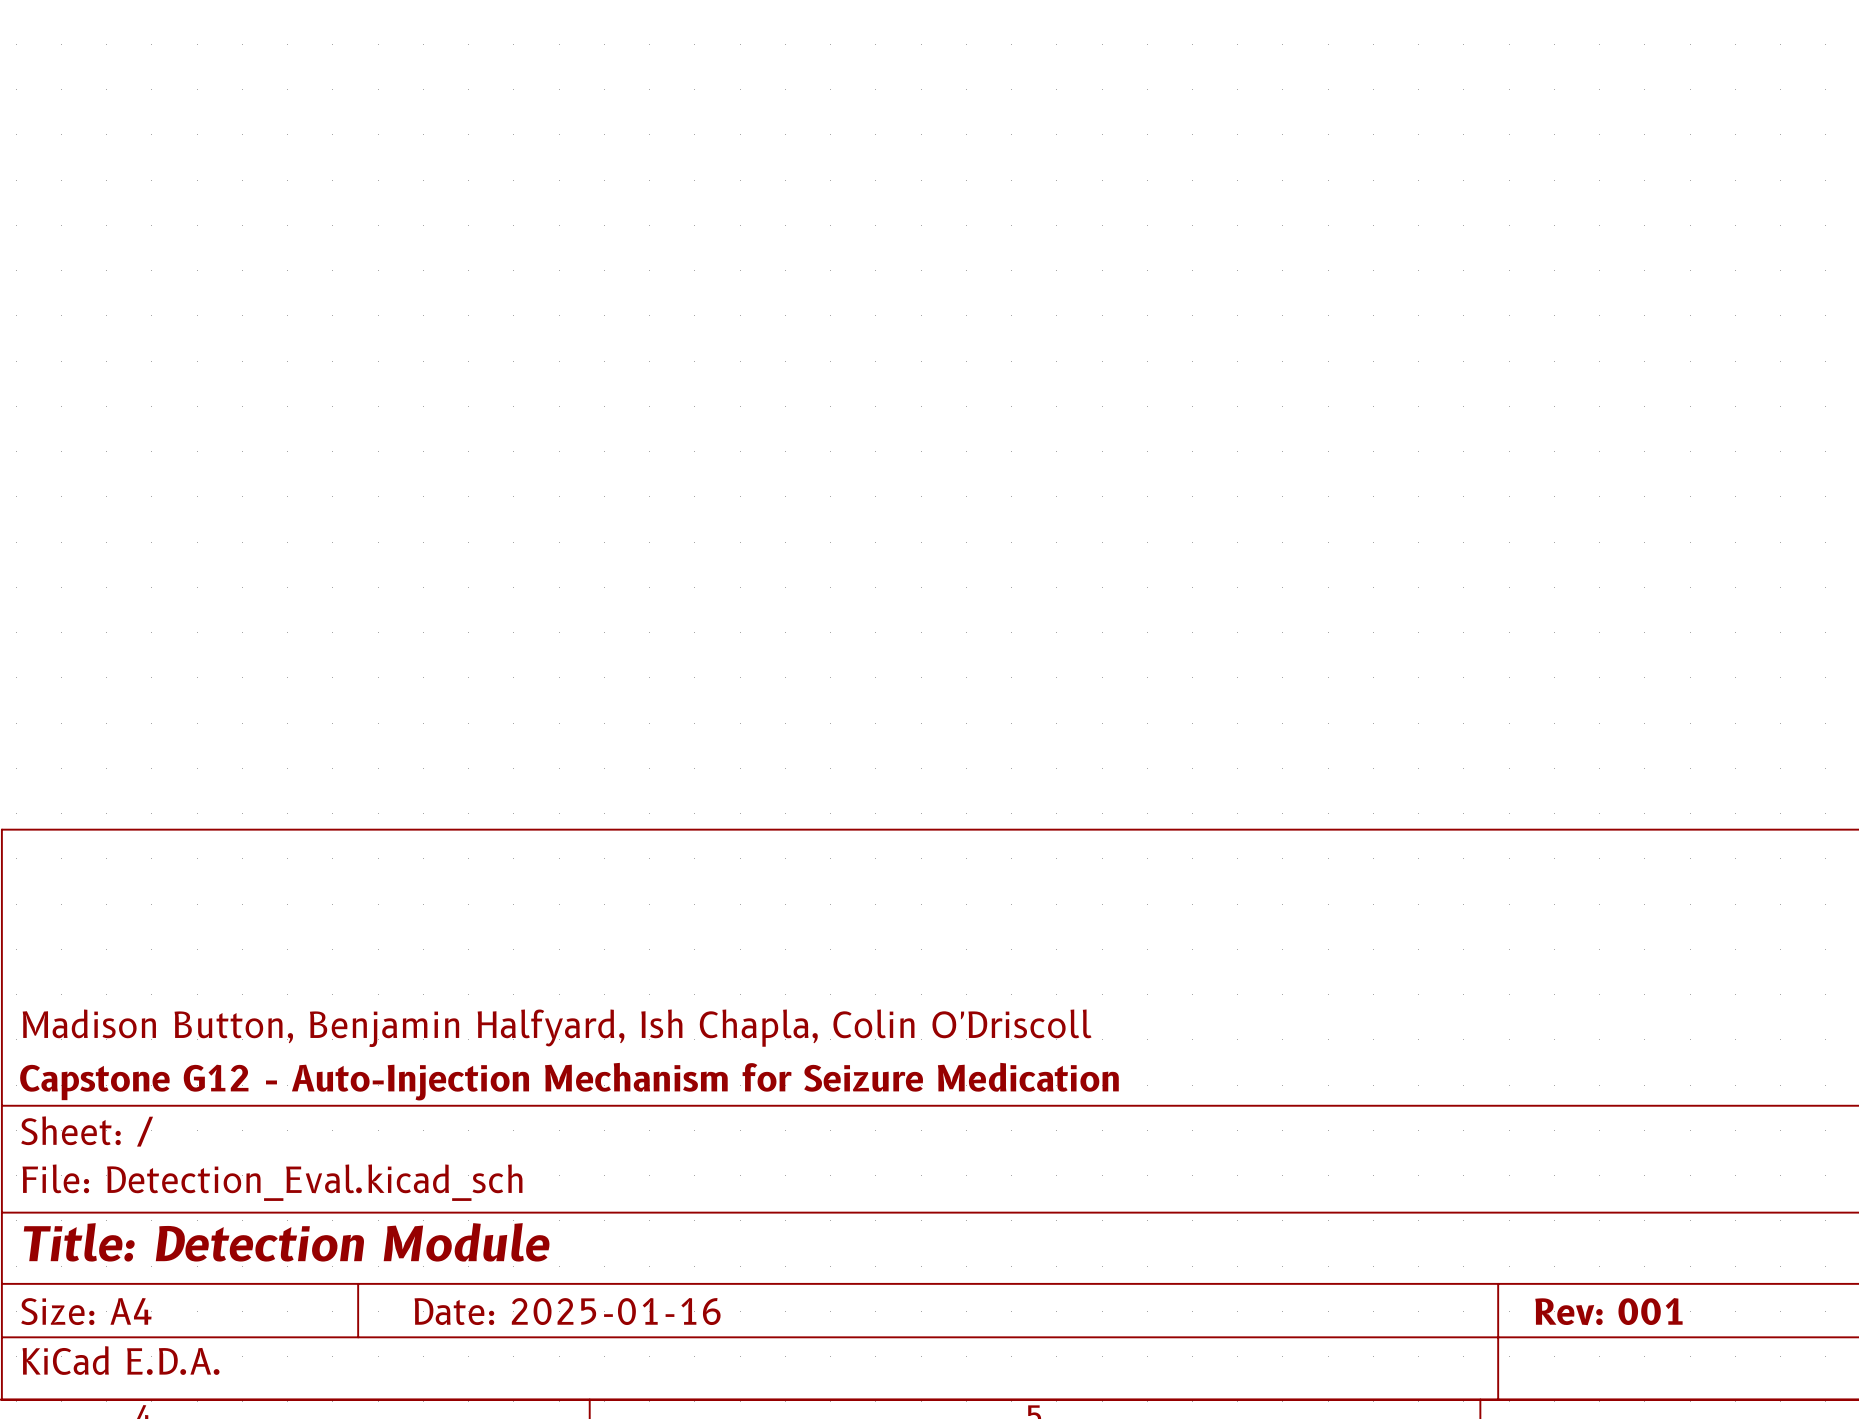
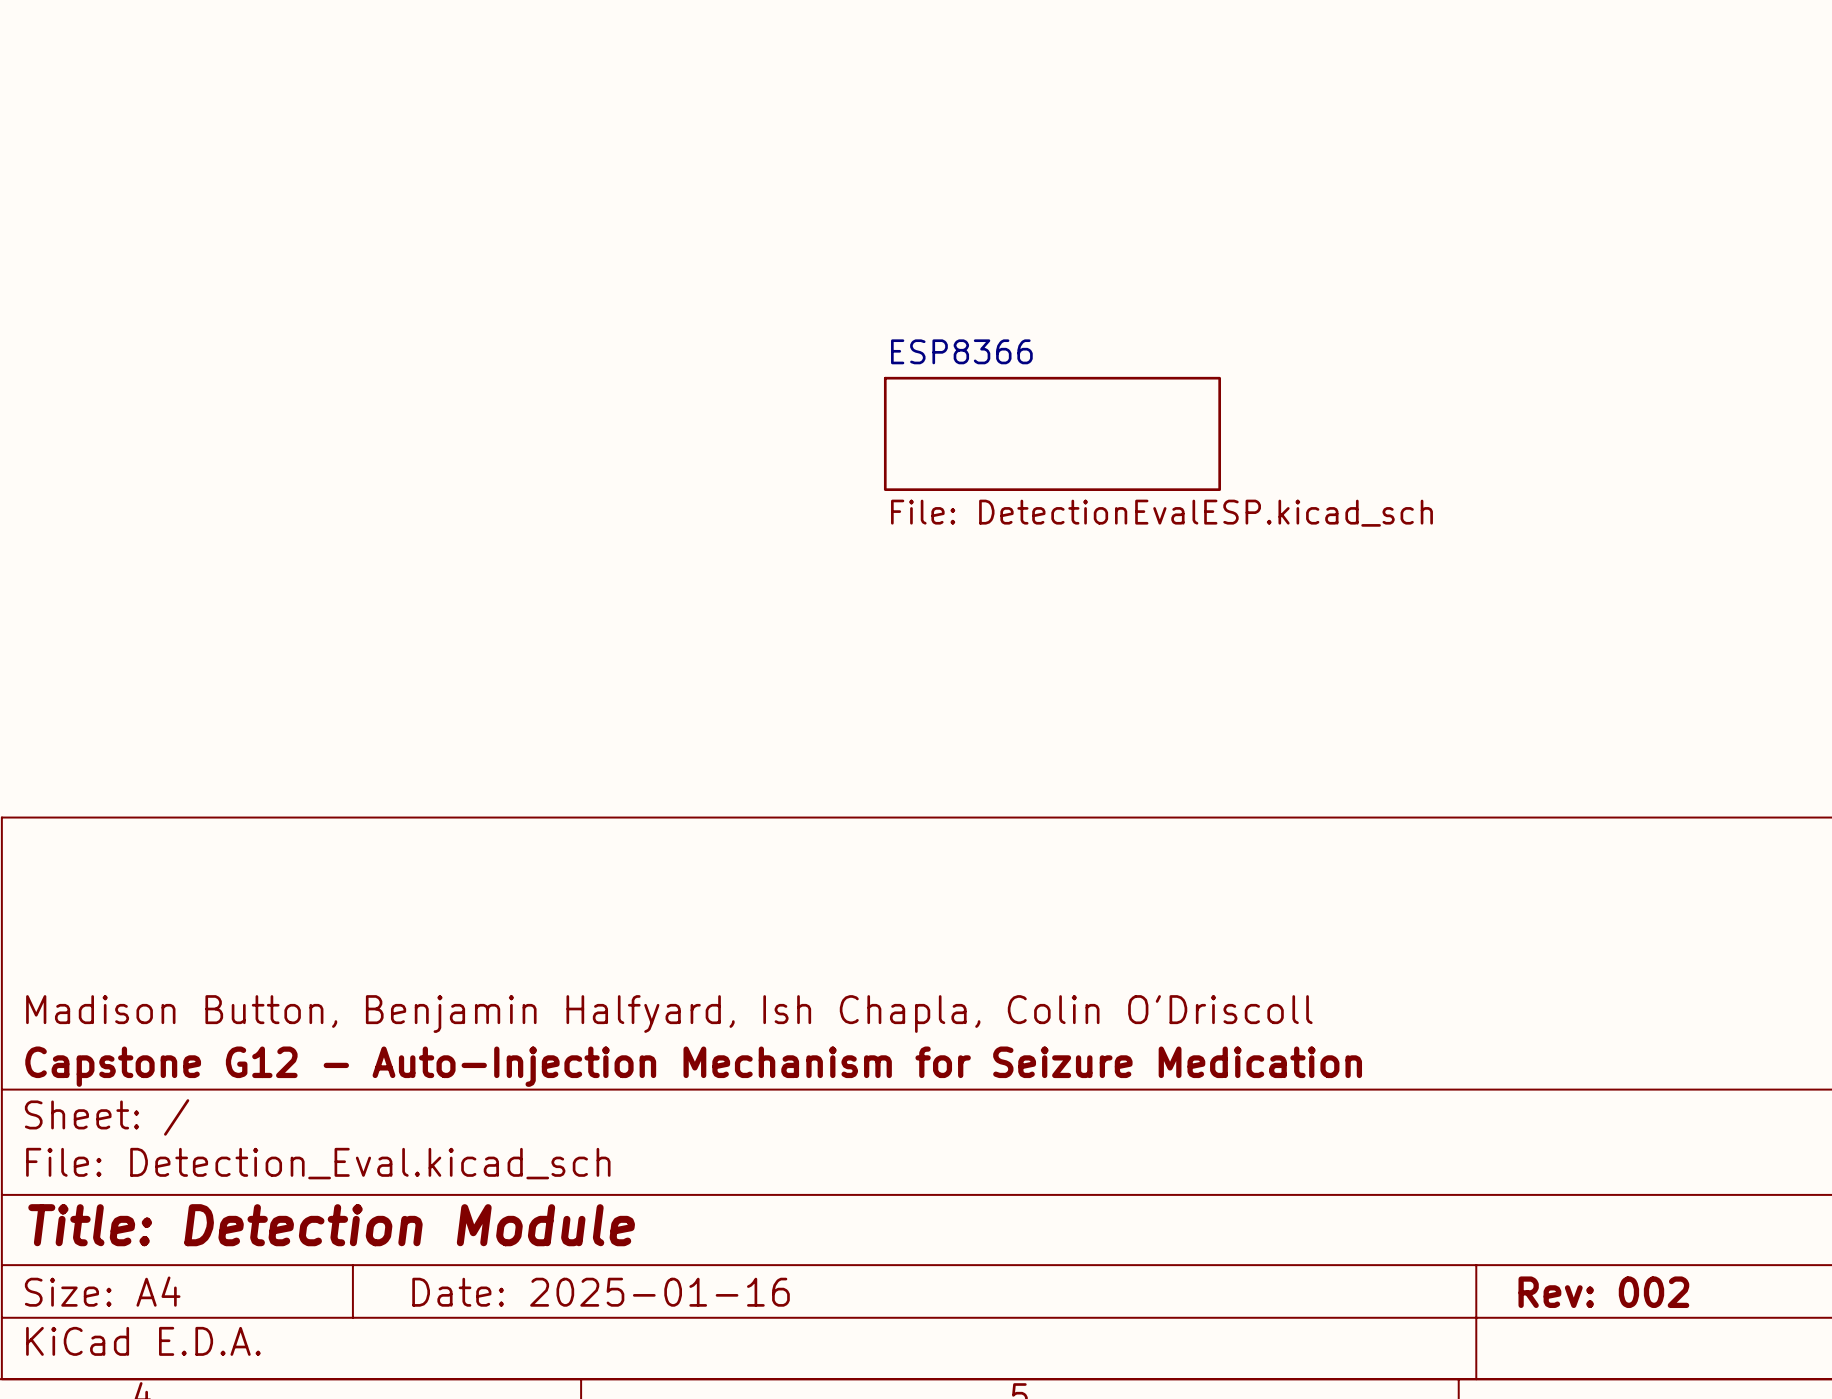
sheet ESP8366: none -> File: DetectionEvalESP.kicad_sch (1052, 433)
title block: Rev: 001 (1608, 1311) -> Rev: 002 (1603, 1292)

